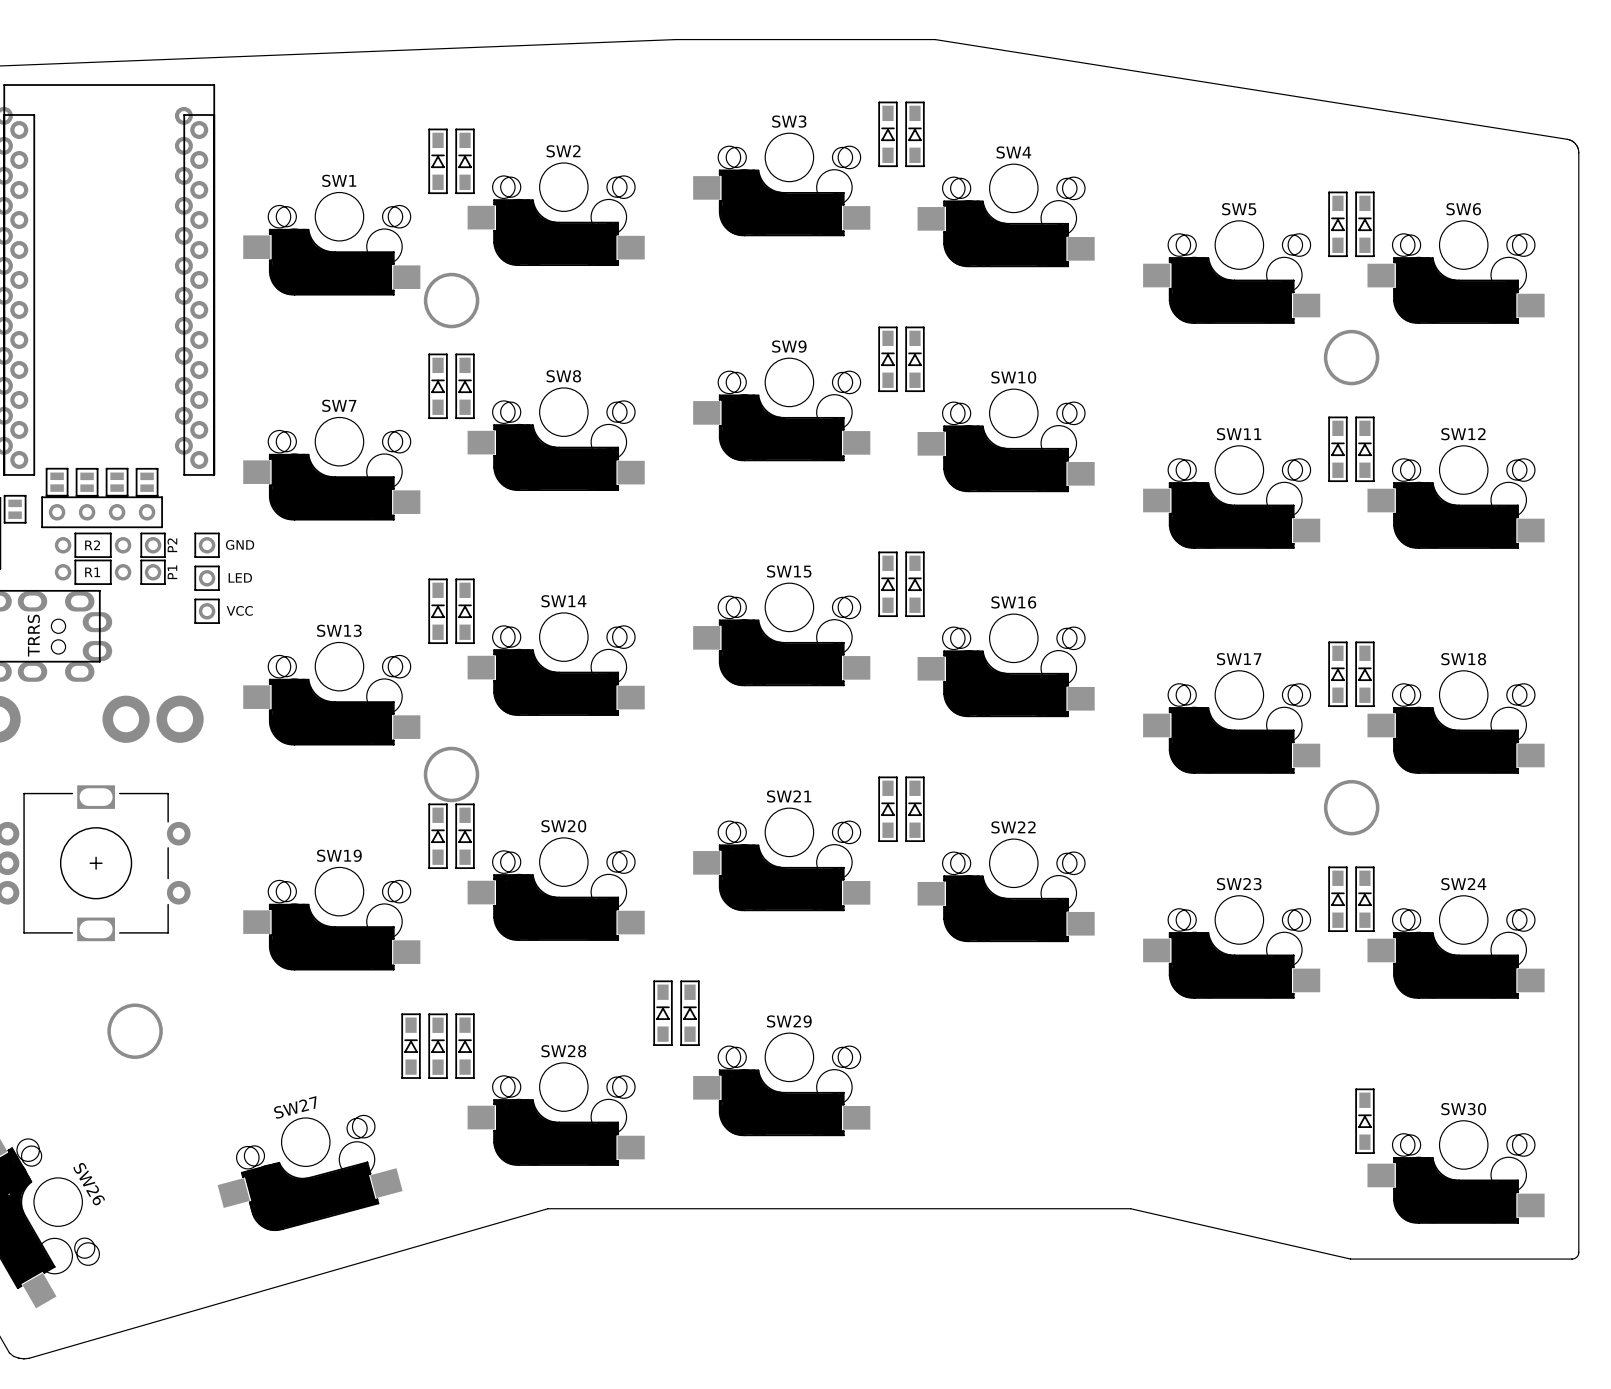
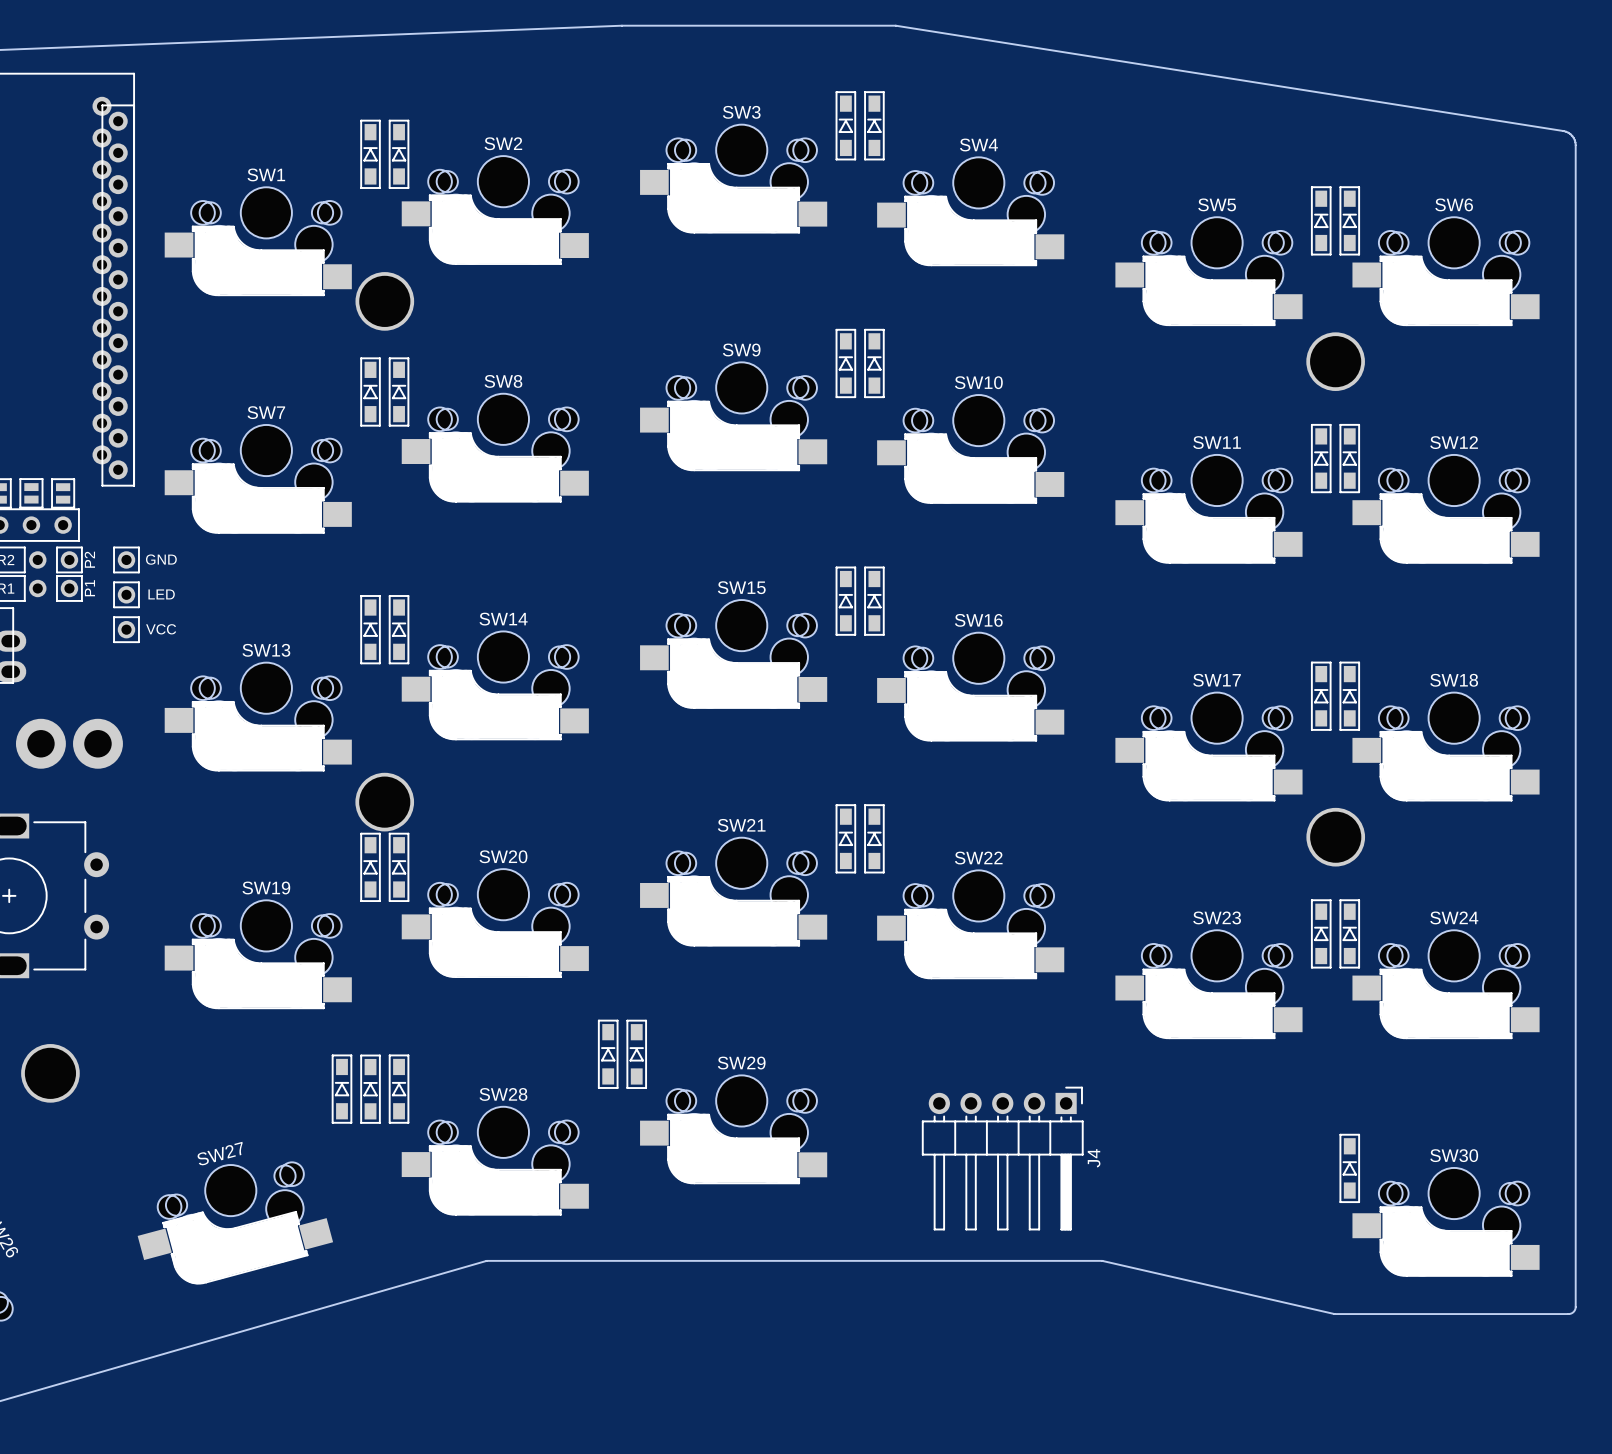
J4: none -> (1002, 1158)

